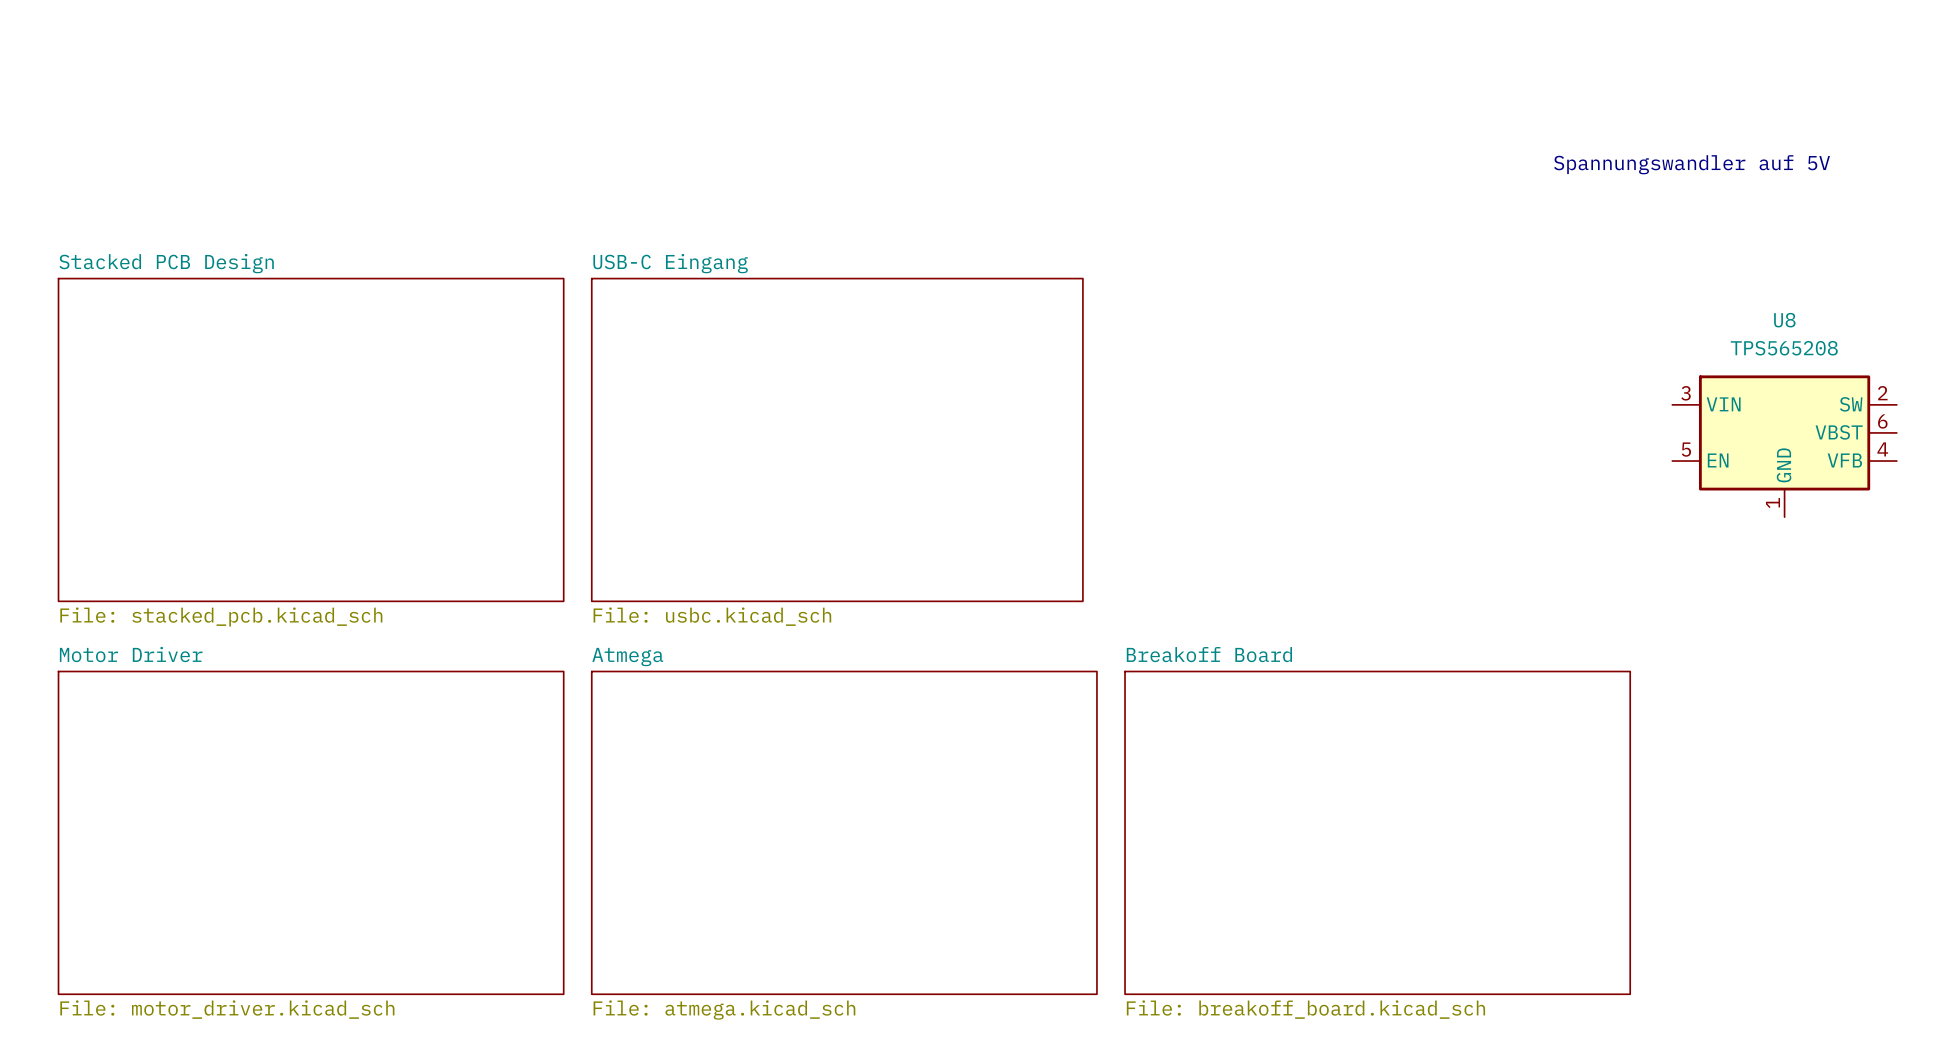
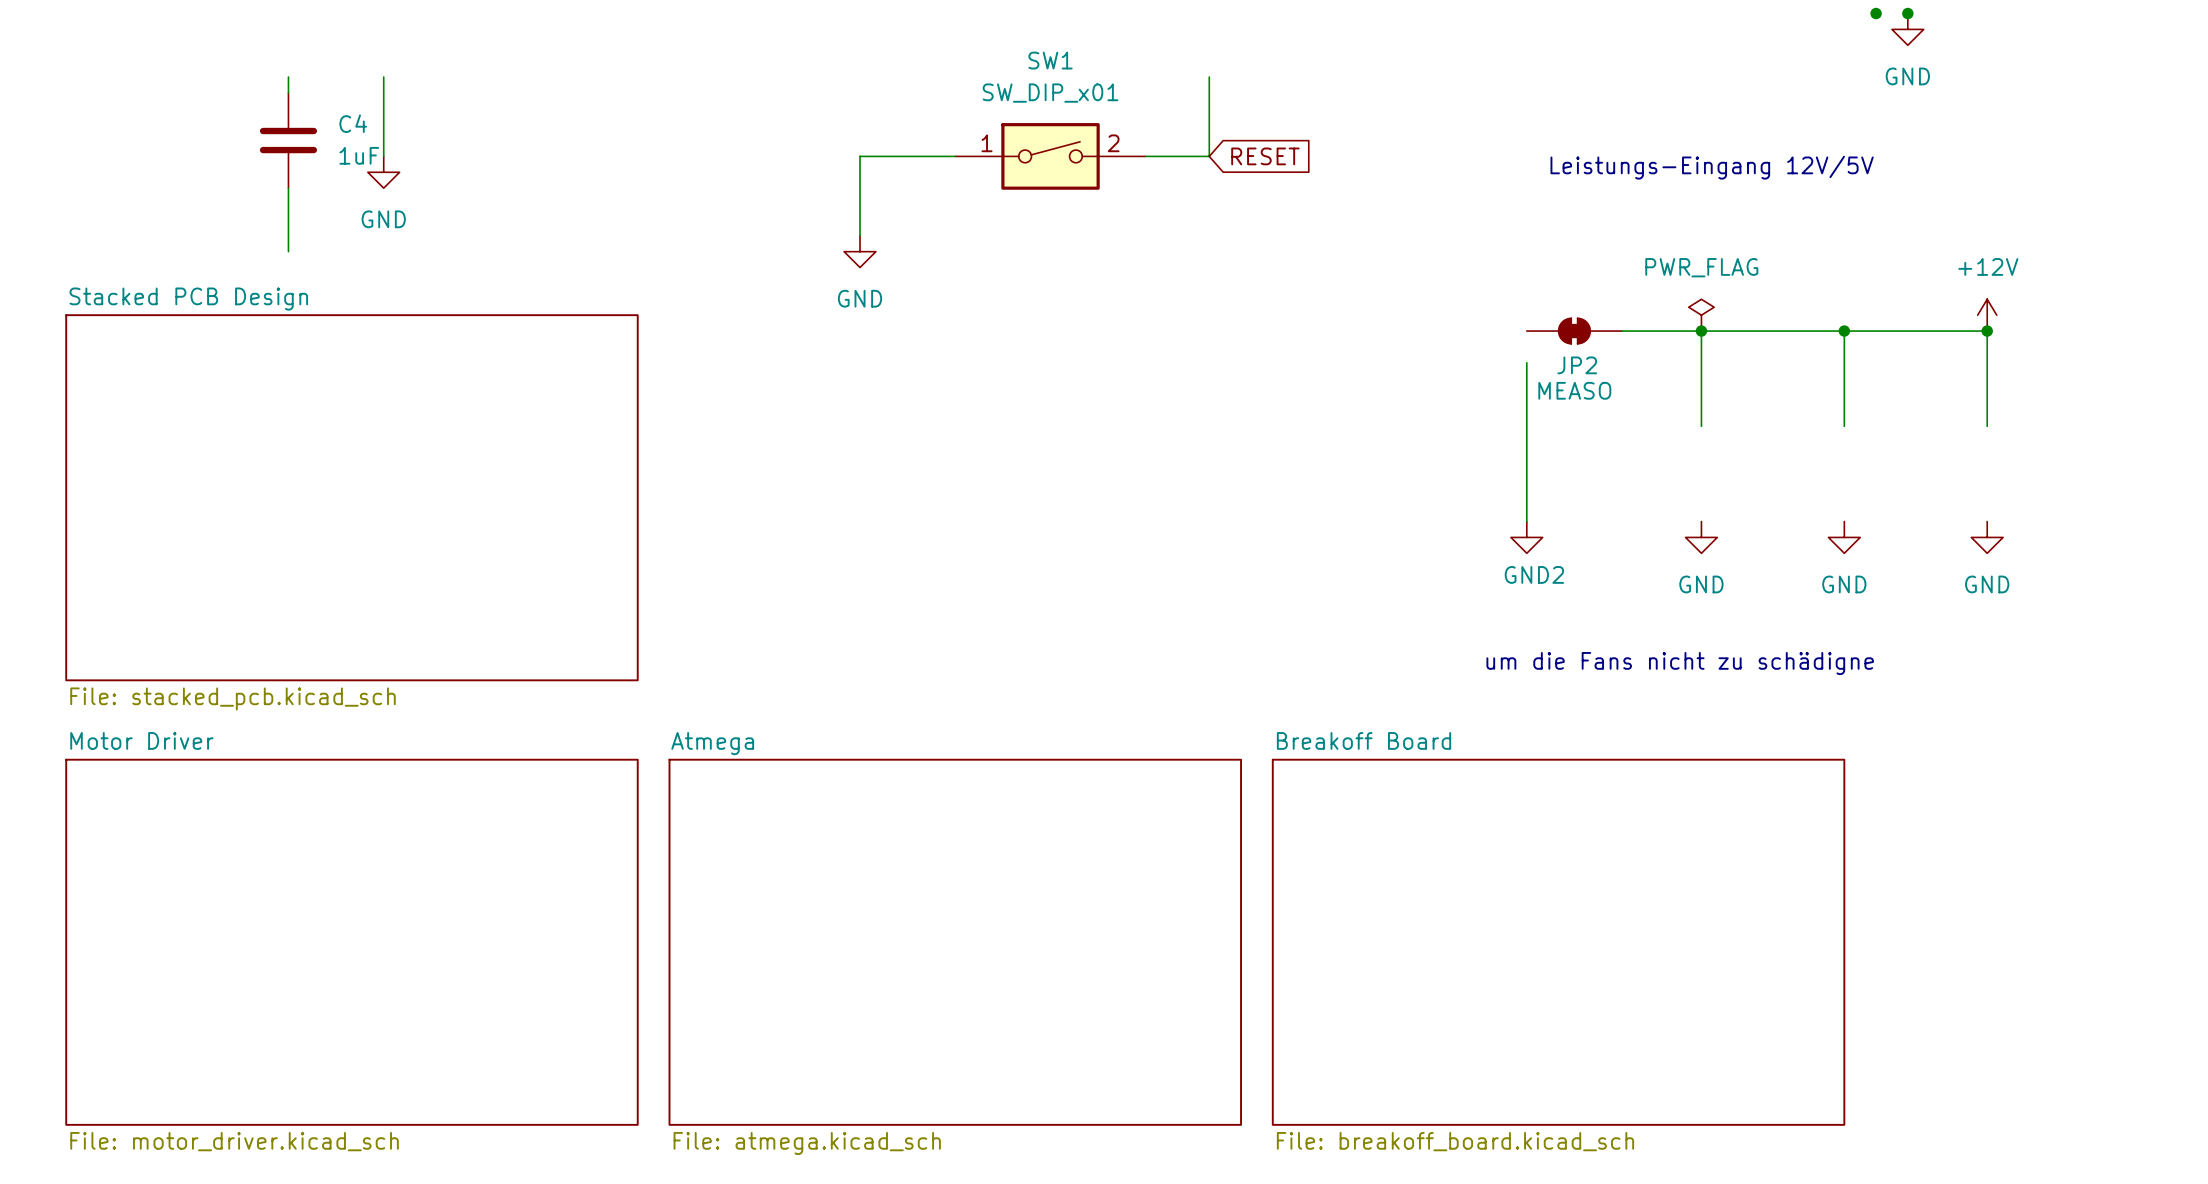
junction: none -> (1876, 13)
junction: none -> (1907, 13)
power symbol: none -> GND (1907, 29)
wire: none -> (288, 77) (288, 92)
wire: none -> (383, 77) (383, 156)
wire: none -> (1209, 77) (1209, 156) (1145, 156)
C4: none -> 1uF (288, 140)
wire: none -> (955, 156) (860, 156) (860, 235)
SW1: none -> SW_DIP_x01 (1050, 156)
global label: none -> RESET (1265, 156)
text: none -> Leistungs-Eingang 12V/5V (1712, 167)
power symbol: none -> GND (383, 172)
text: Spannungswandler auf 5V (1692, 164) -> none
wire: none -> (288, 188) (288, 251)
power symbol: none -> GND (860, 251)
power symbol: none -> PWR_FLAG (1701, 315)
power symbol: none -> +12V (1987, 315)
JP2: none -> MEASO (1574, 331)
wire: none -> (1622, 331) (1987, 331) (1987, 426)
wire: none -> (1701, 331) (1701, 426)
junction: none -> (1701, 331)
wire: none -> (1844, 331) (1844, 426)
junction: none -> (1844, 331)
junction: none -> (1987, 331)
wire: none -> (1526, 362) (1526, 521)
sheet USB-C Eingang: File: usbc.kicad_sch (837, 439) -> none
U8: TPS565208 (1784, 446) -> none
power symbol: none -> GND2 (1526, 537)
power symbol: none -> GND (1701, 537)
power symbol: none -> GND (1844, 537)
power symbol: none -> GND (1987, 537)
text: none -> um die Fans nicht zu schädigne (1680, 663)

